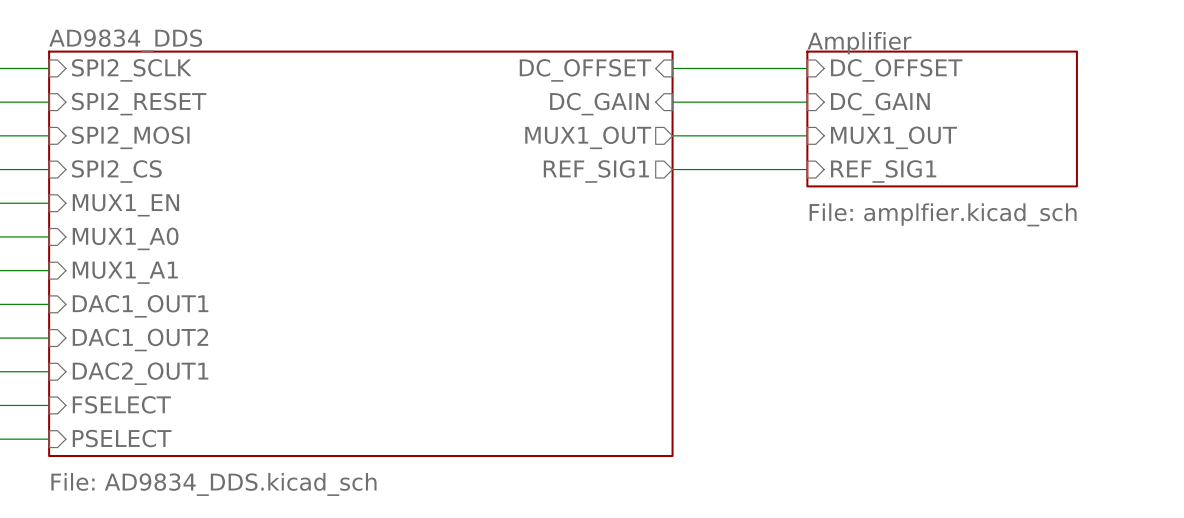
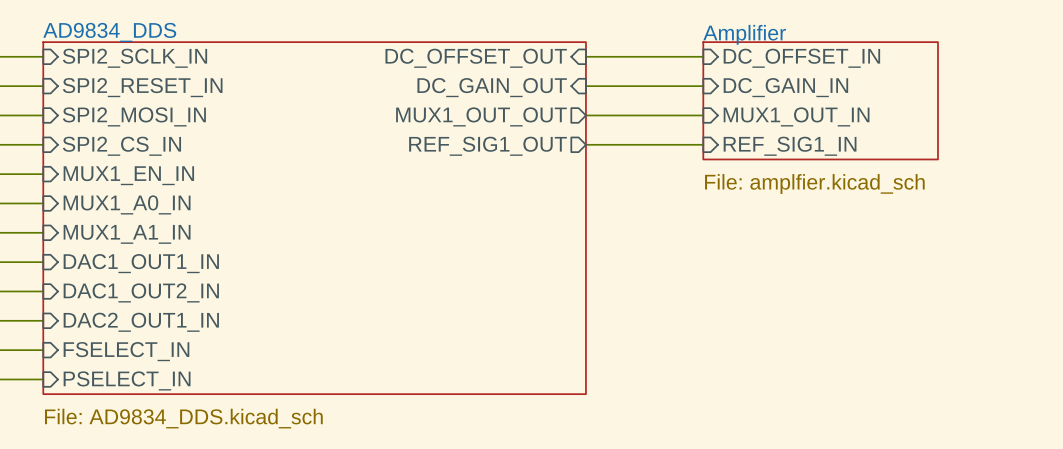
sheet pin: SPI2_SCLK (131, 70) -> SPI2_SCLK_IN (134, 58)
sheet pin: DC_OFFSET (585, 70) -> DC_OFFSET_OUT (476, 58)
sheet pin: DC_OFFSET (896, 70) -> DC_OFFSET_IN (801, 58)
sheet pin: SPI2_RESET (139, 104) -> SPI2_RESET_IN (142, 87)
sheet pin: DC_GAIN (599, 104) -> DC_GAIN_OUT (492, 87)
sheet pin: DC_GAIN (880, 104) -> DC_GAIN_IN (785, 87)
sheet pin: SPI2_MOSI (130, 137) -> SPI2_MOSI_IN (134, 116)
sheet pin: MUX1_OUT (588, 137) -> MUX1_OUT_OUT (481, 116)
sheet pin: MUX1_OUT (894, 137) -> MUX1_OUT_IN (796, 116)
sheet pin: SPI2_CS (116, 171) -> SPI2_CS_IN (121, 146)
sheet pin: REF_SIG1 (596, 171) -> REF_SIG1_OUT (488, 146)
sheet pin: REF_SIG1 (883, 171) -> REF_SIG1_IN (790, 146)
sheet pin: MUX1_EN (125, 205) -> MUX1_EN_IN (128, 175)
sheet pin: MUX1_A0 (125, 238) -> MUX1_A0_IN (127, 204)
sheet pin: MUX1_A1 (125, 272) -> MUX1_A1_IN (127, 234)
sheet pin: DAC1_OUT1 (140, 306) -> DAC1_OUT1_IN (141, 263)
sheet pin: DAC1_OUT2 (140, 339) -> DAC1_OUT2_IN (141, 292)
sheet pin: DAC2_OUT1 (140, 373) -> DAC2_OUT1_IN (141, 322)
sheet pin: FSELECT (121, 404) -> FSELECT_IN (126, 351)
sheet pin: PSELECT (122, 438) -> PSELECT_IN (127, 380)

